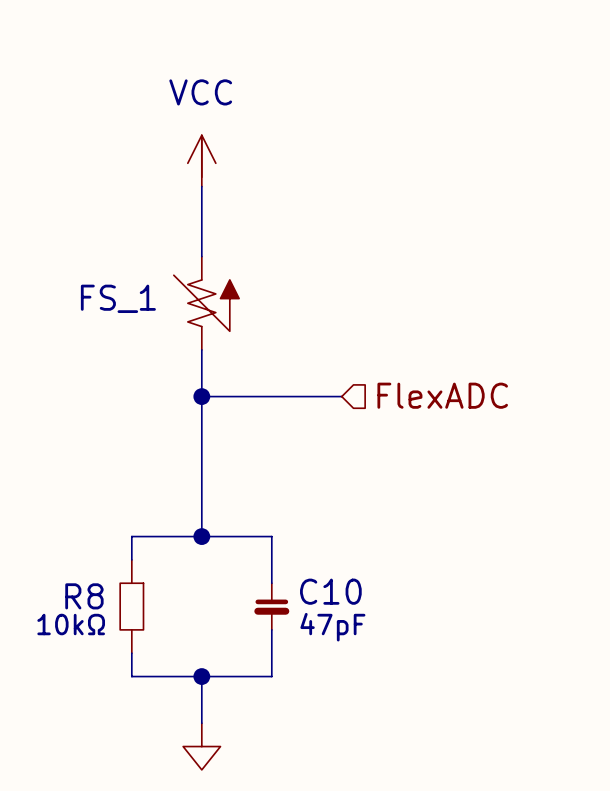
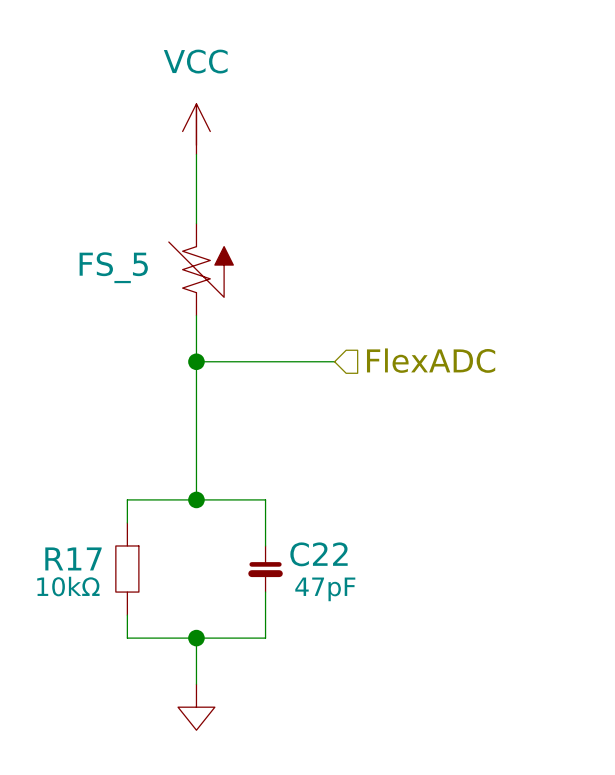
FS_1 name: FS_1 (118, 298) -> FS_5 (113, 267)
C10 name: C10 (330, 591) -> C22 (319, 554)
R8 name: R8 (84, 596) -> R17 (73, 558)

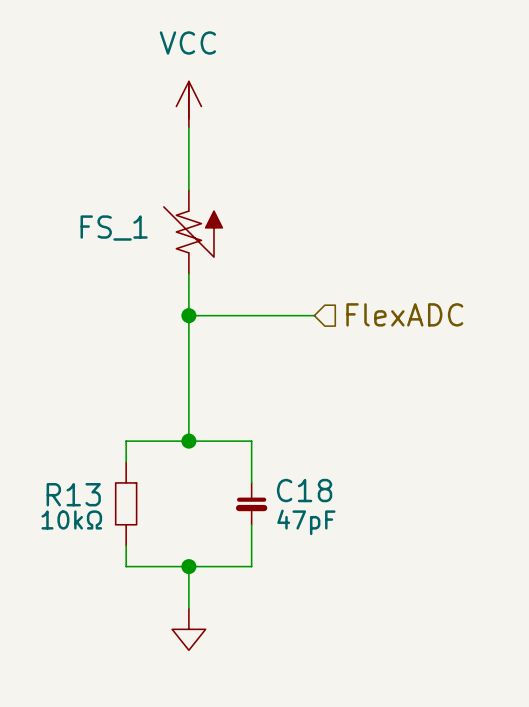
FS_5 name: FS_5 (113, 267) -> FS_1 (114, 228)
C22 name: C22 (319, 554) -> C18 (304, 490)
R17 name: R17 (73, 558) -> R13 (73, 494)

